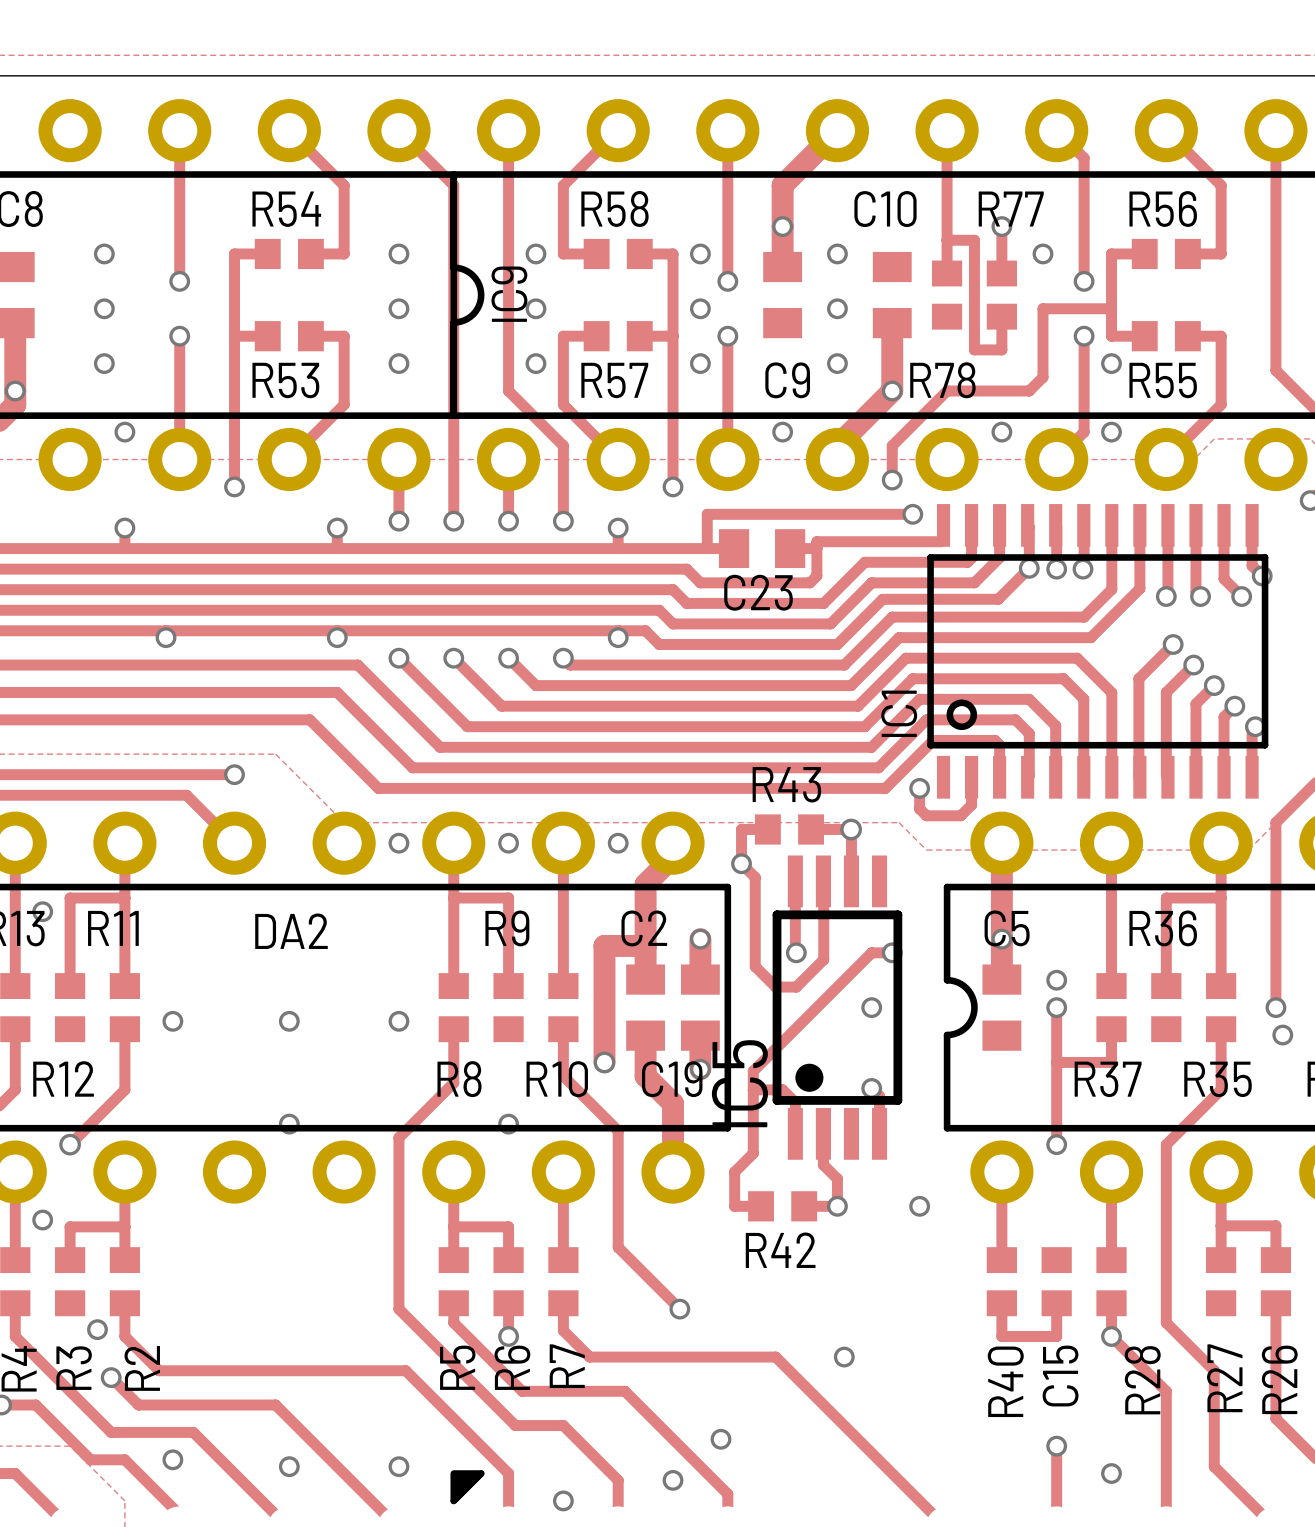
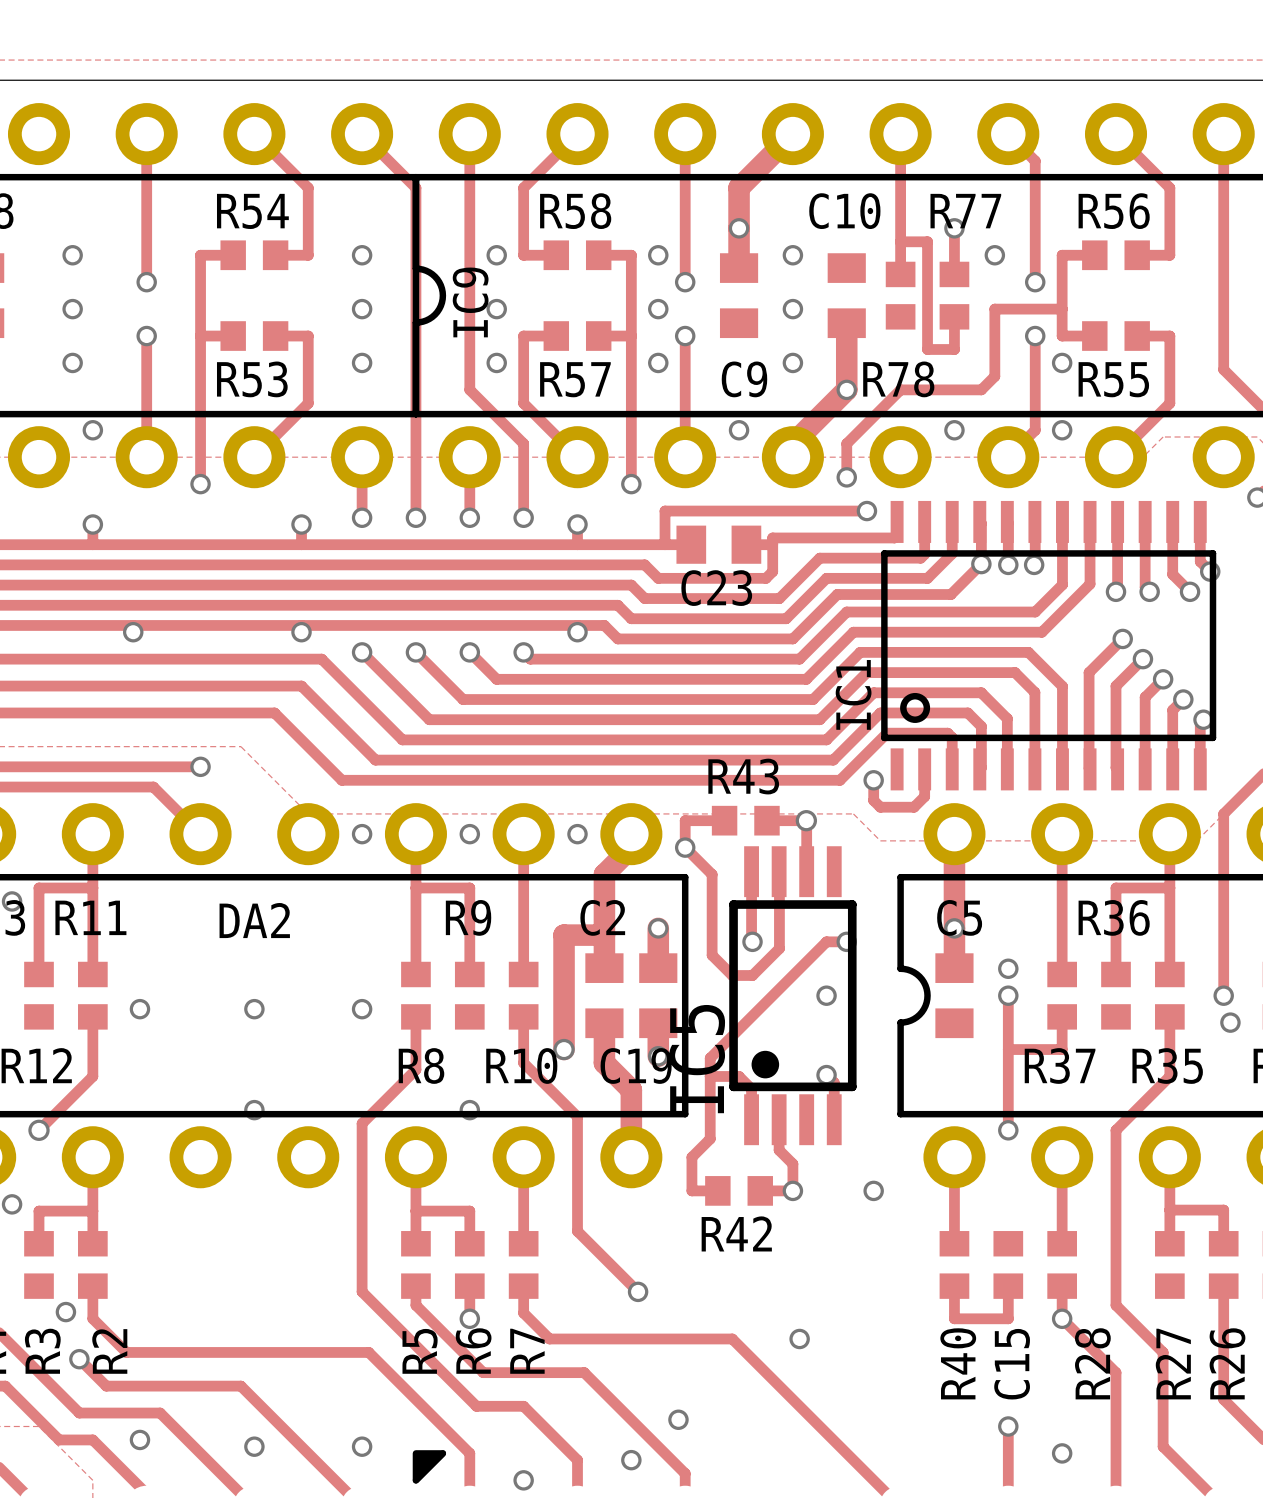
track: (741, 829) (741, 863) (755, 877) (755, 884) -> (698, 820) (685, 820) (685, 847) (712, 874)
via position: (741, 863) -> (685, 847)

